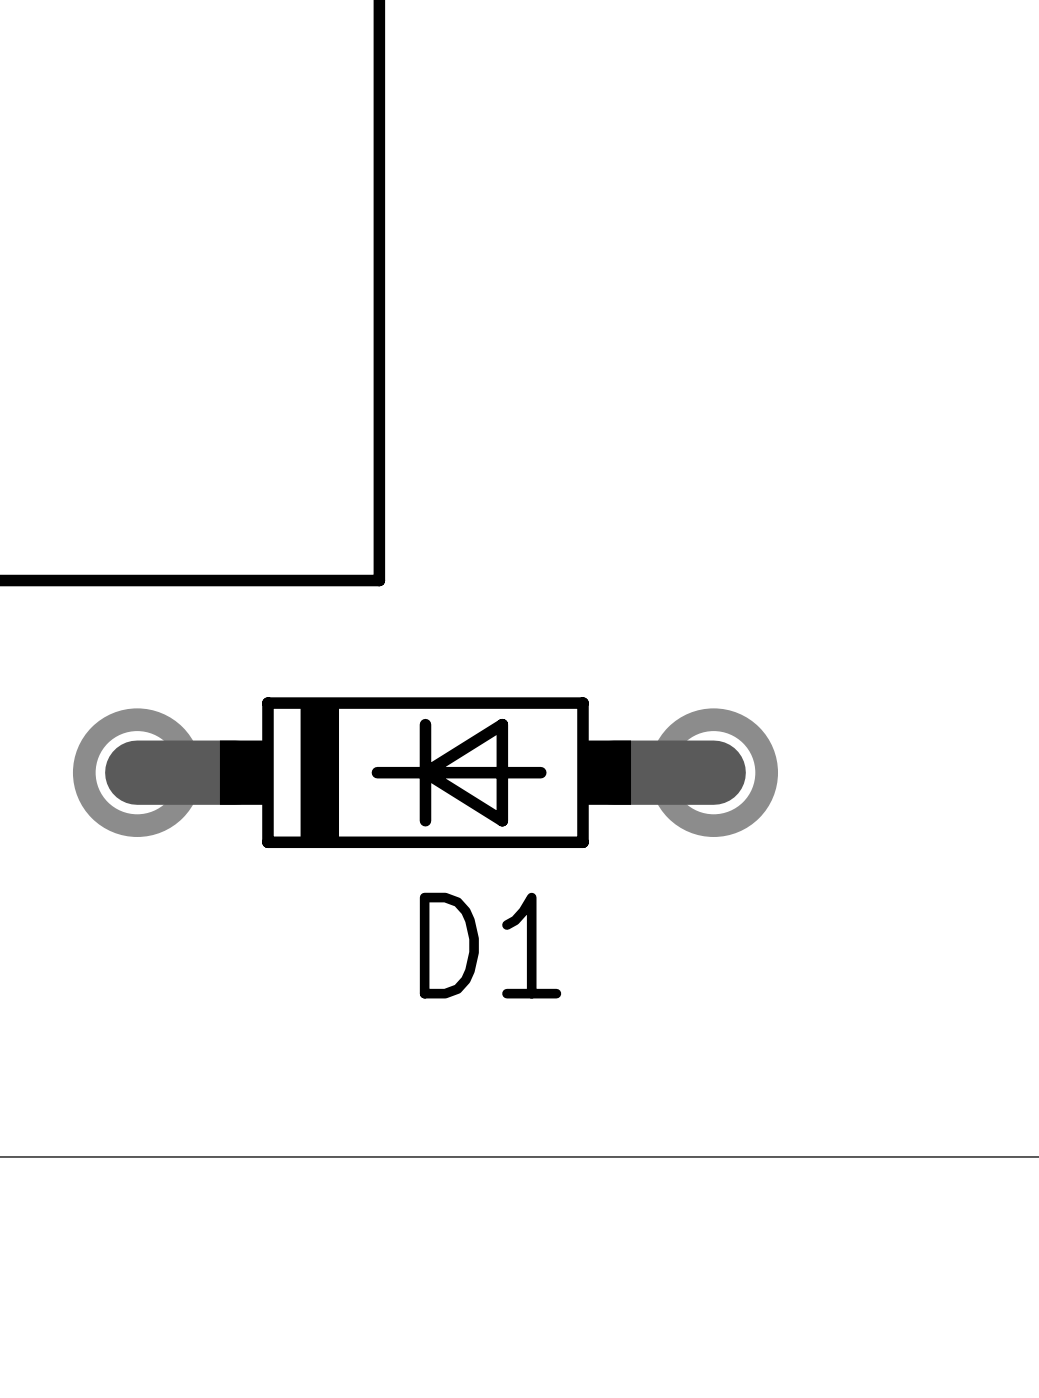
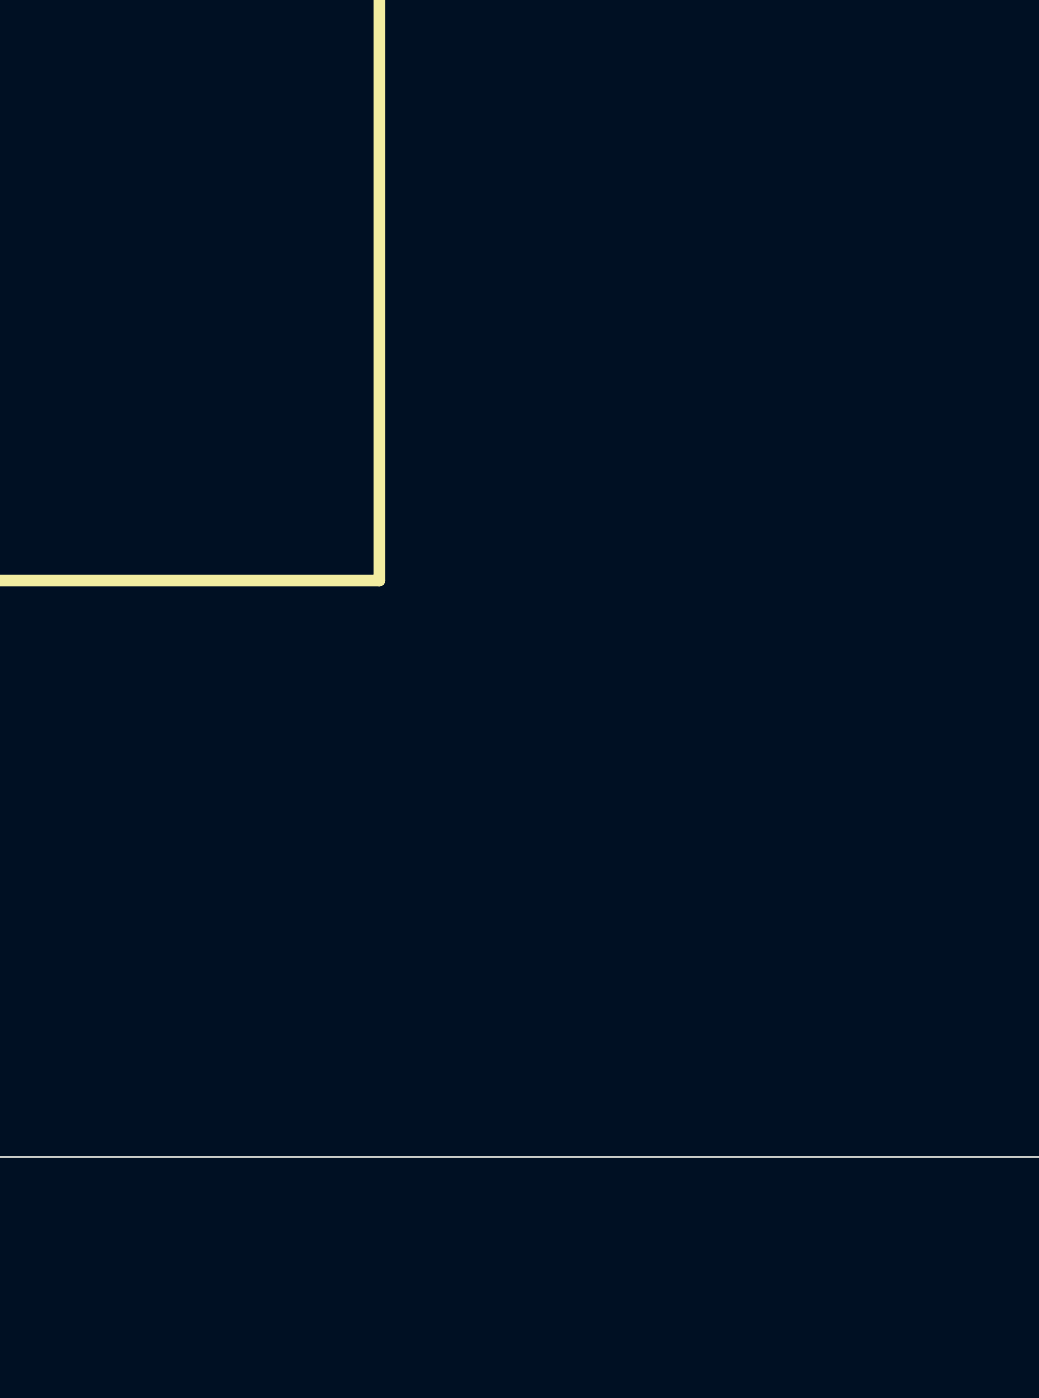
D1: (425, 772) -> none

